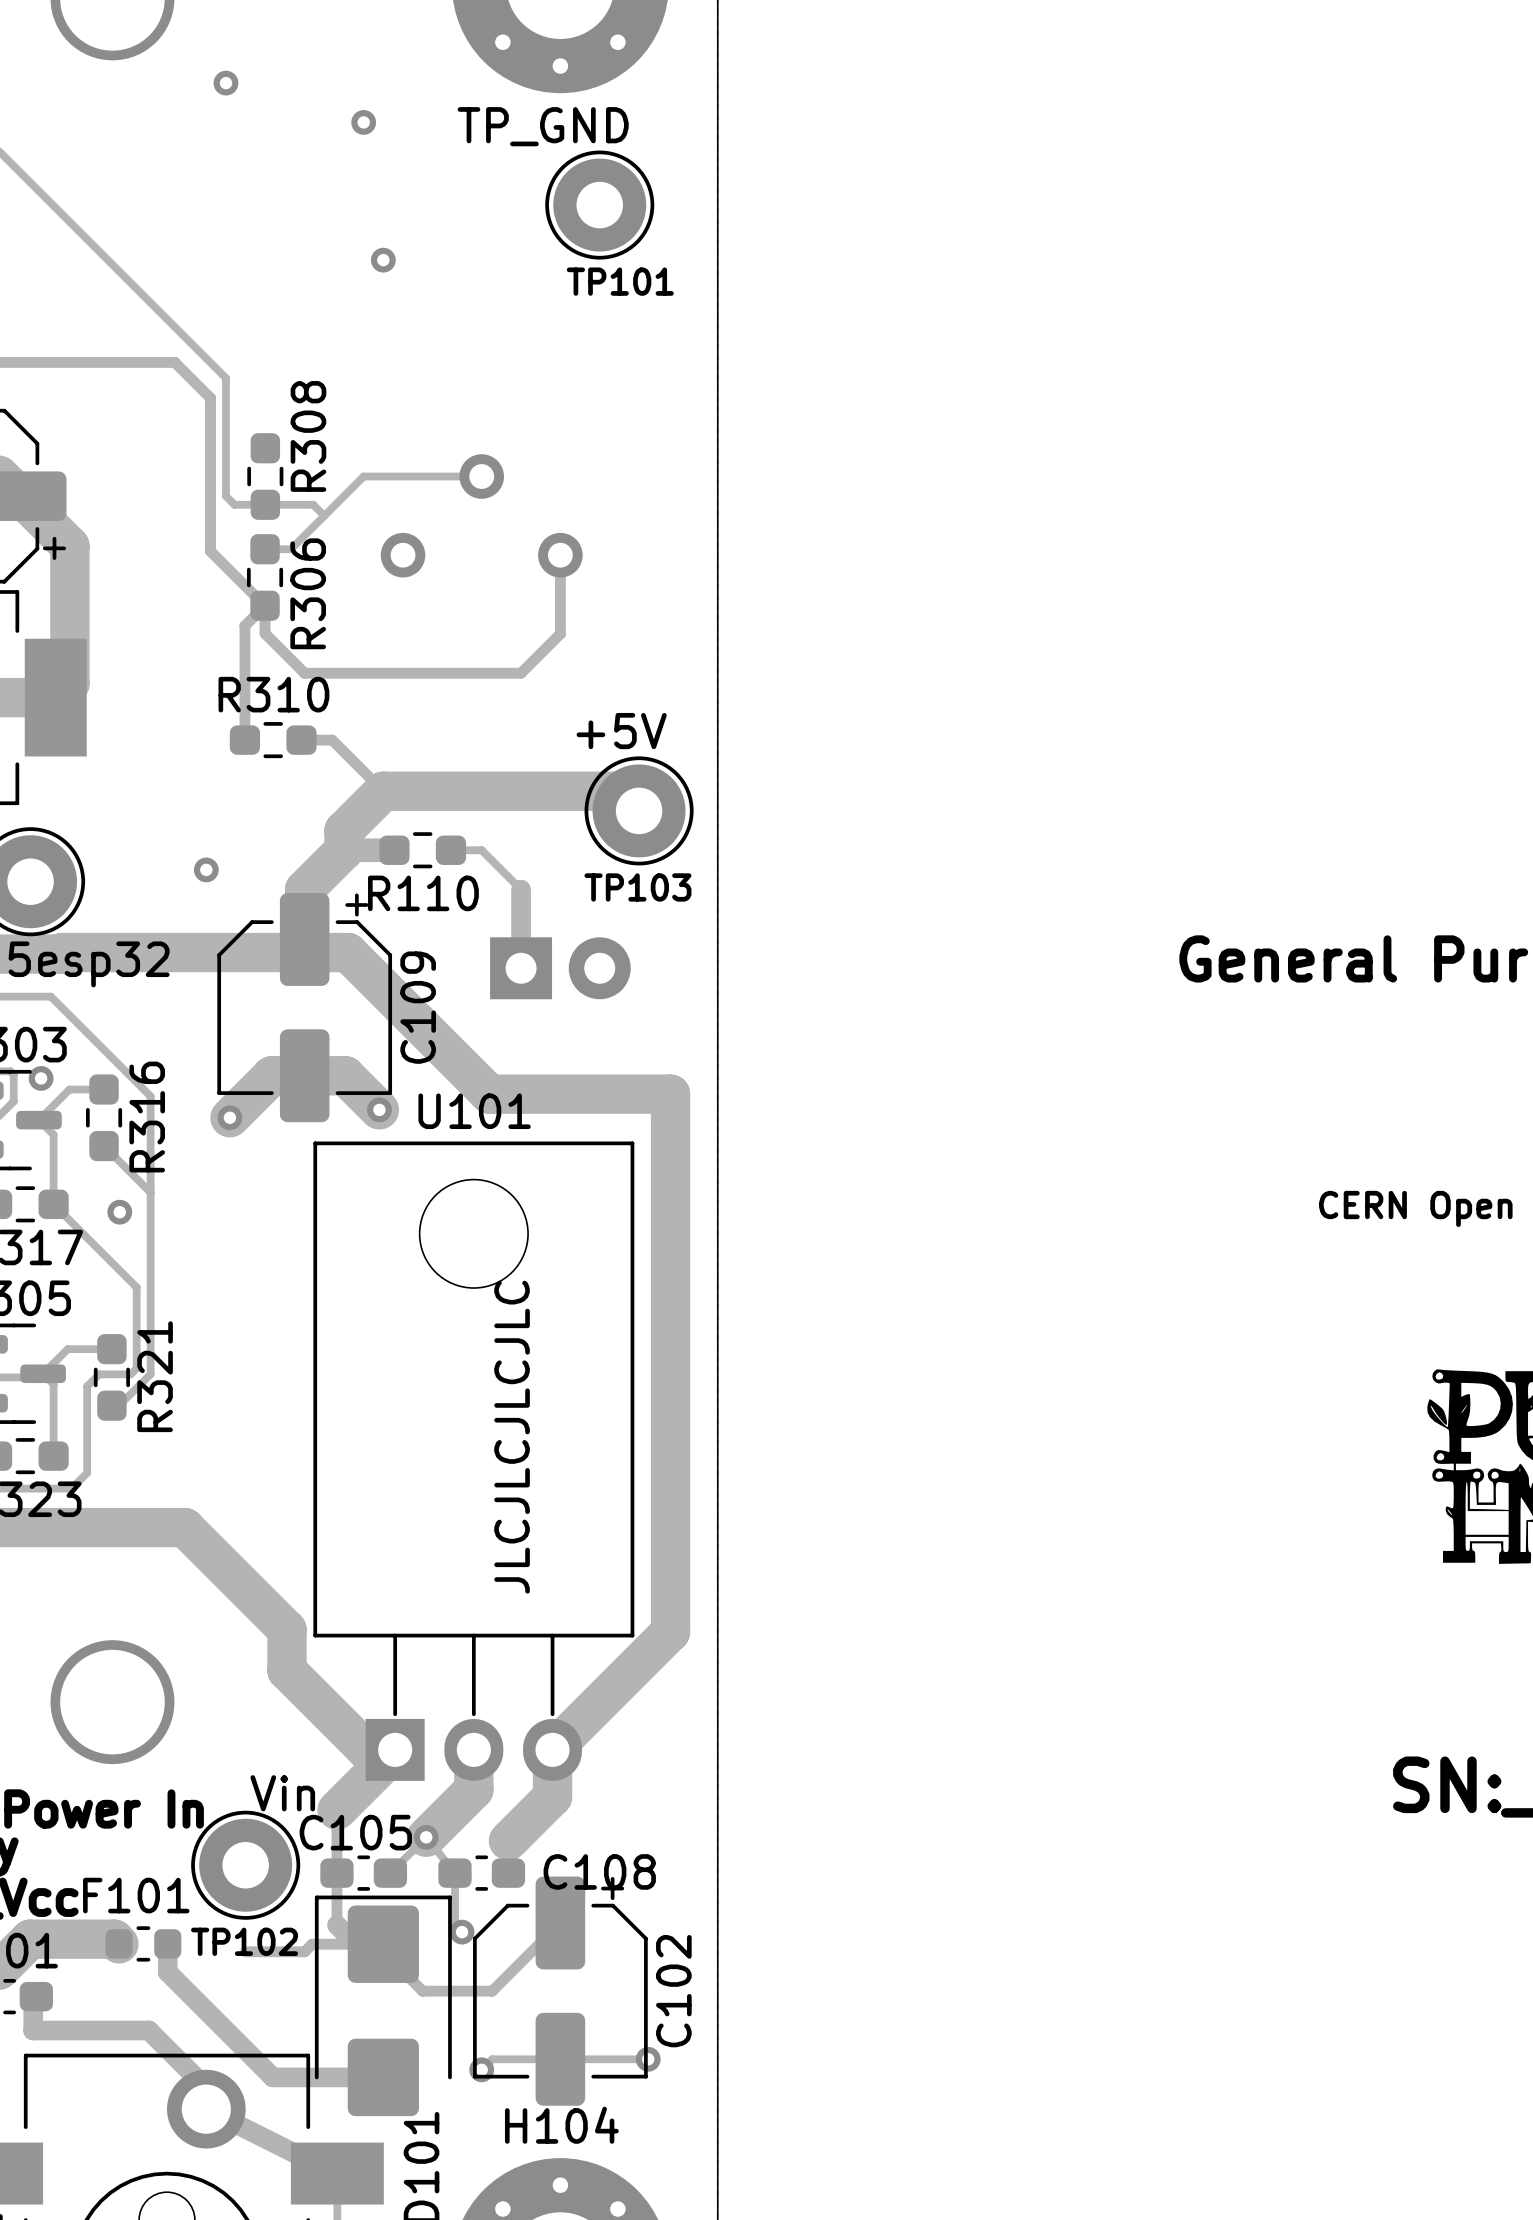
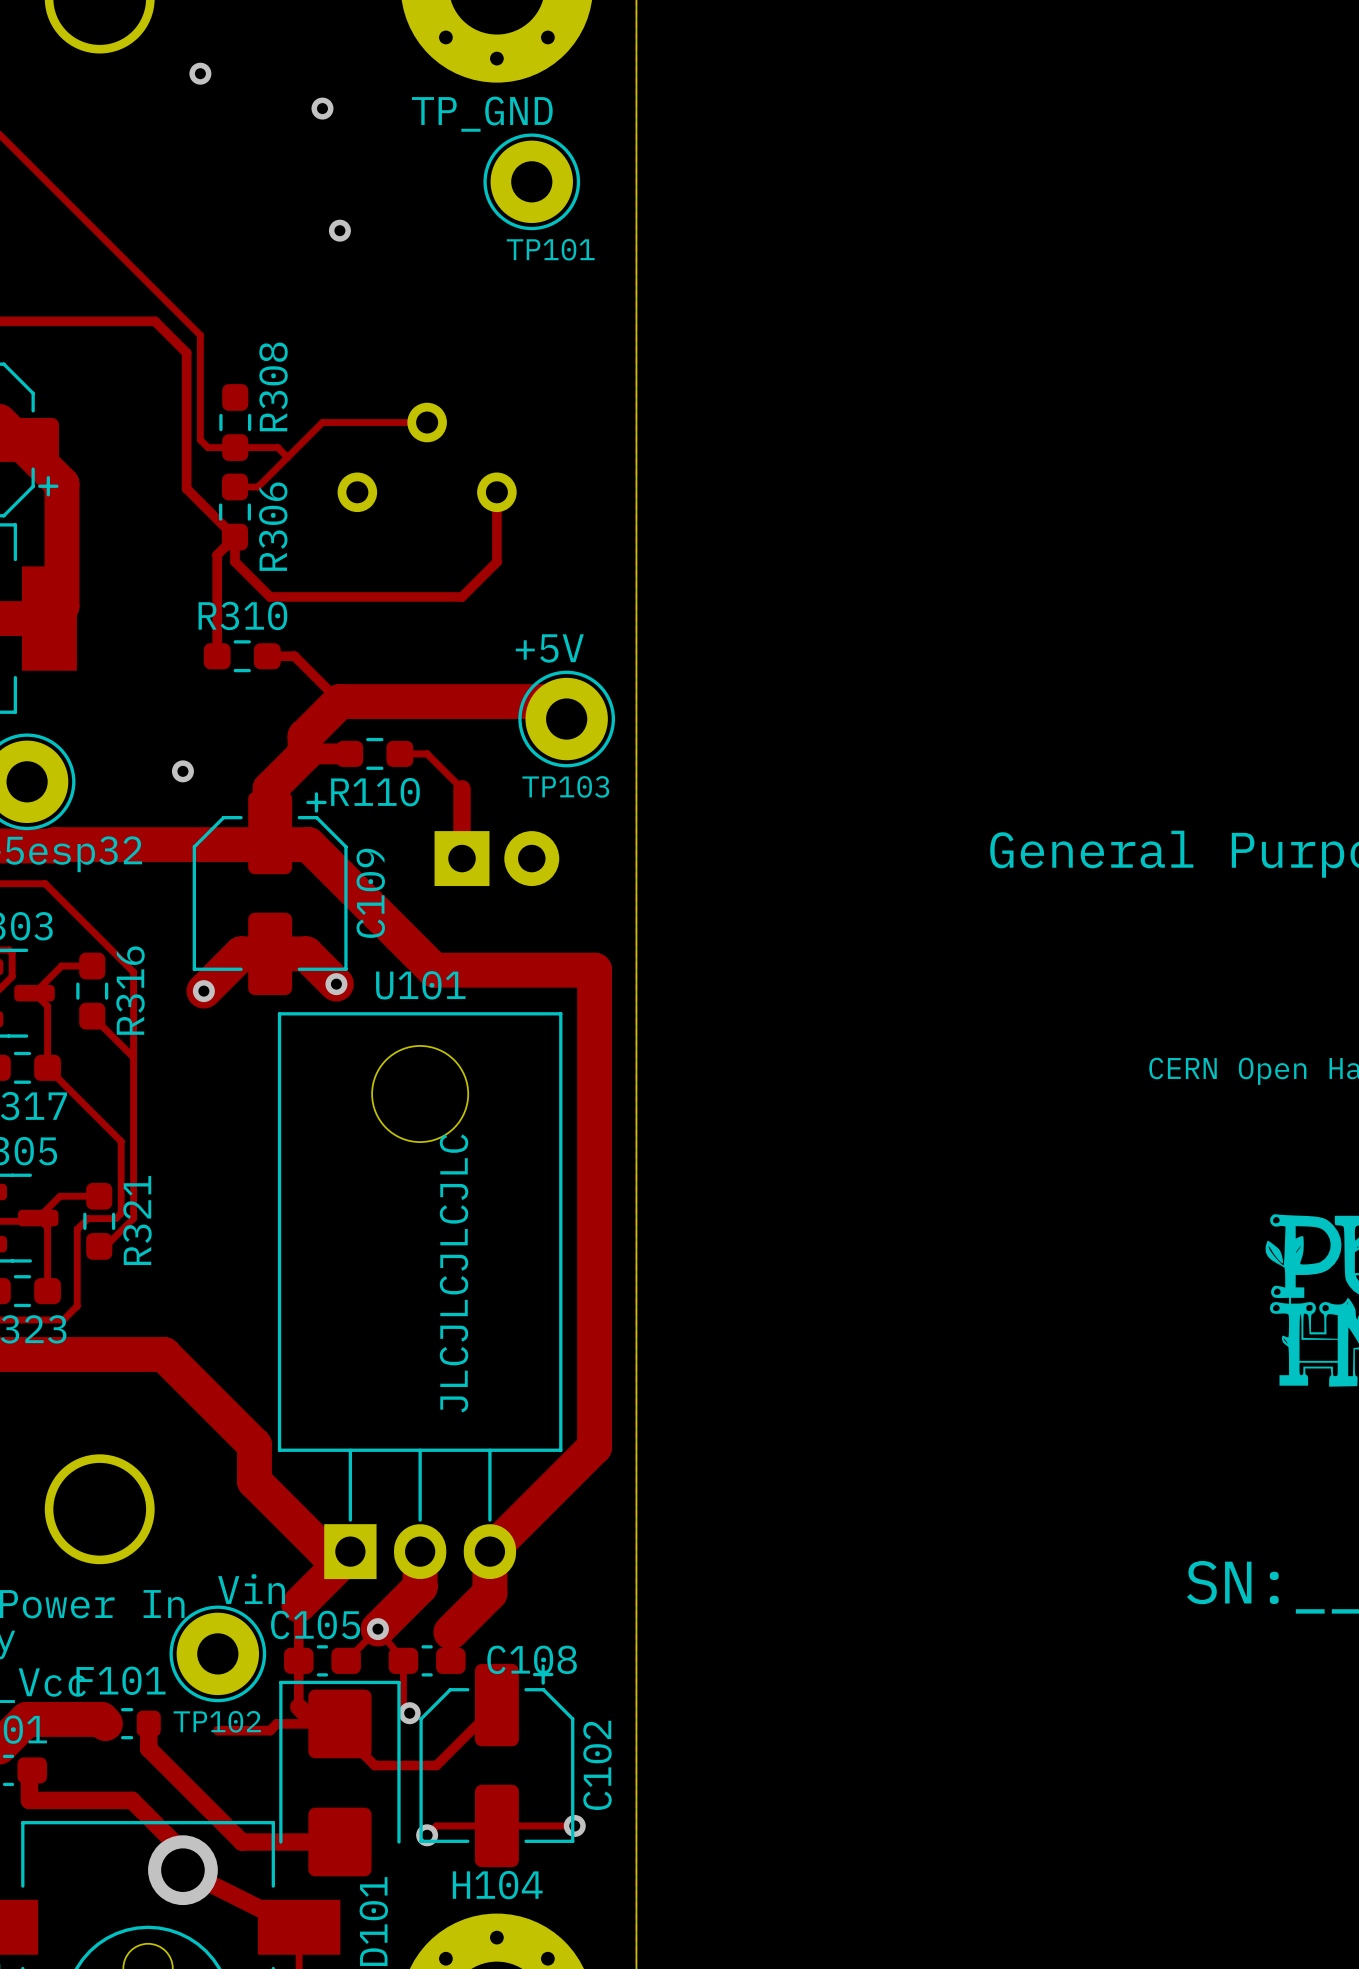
via: (41, 1078) -> none
via: (119, 1212) -> none

